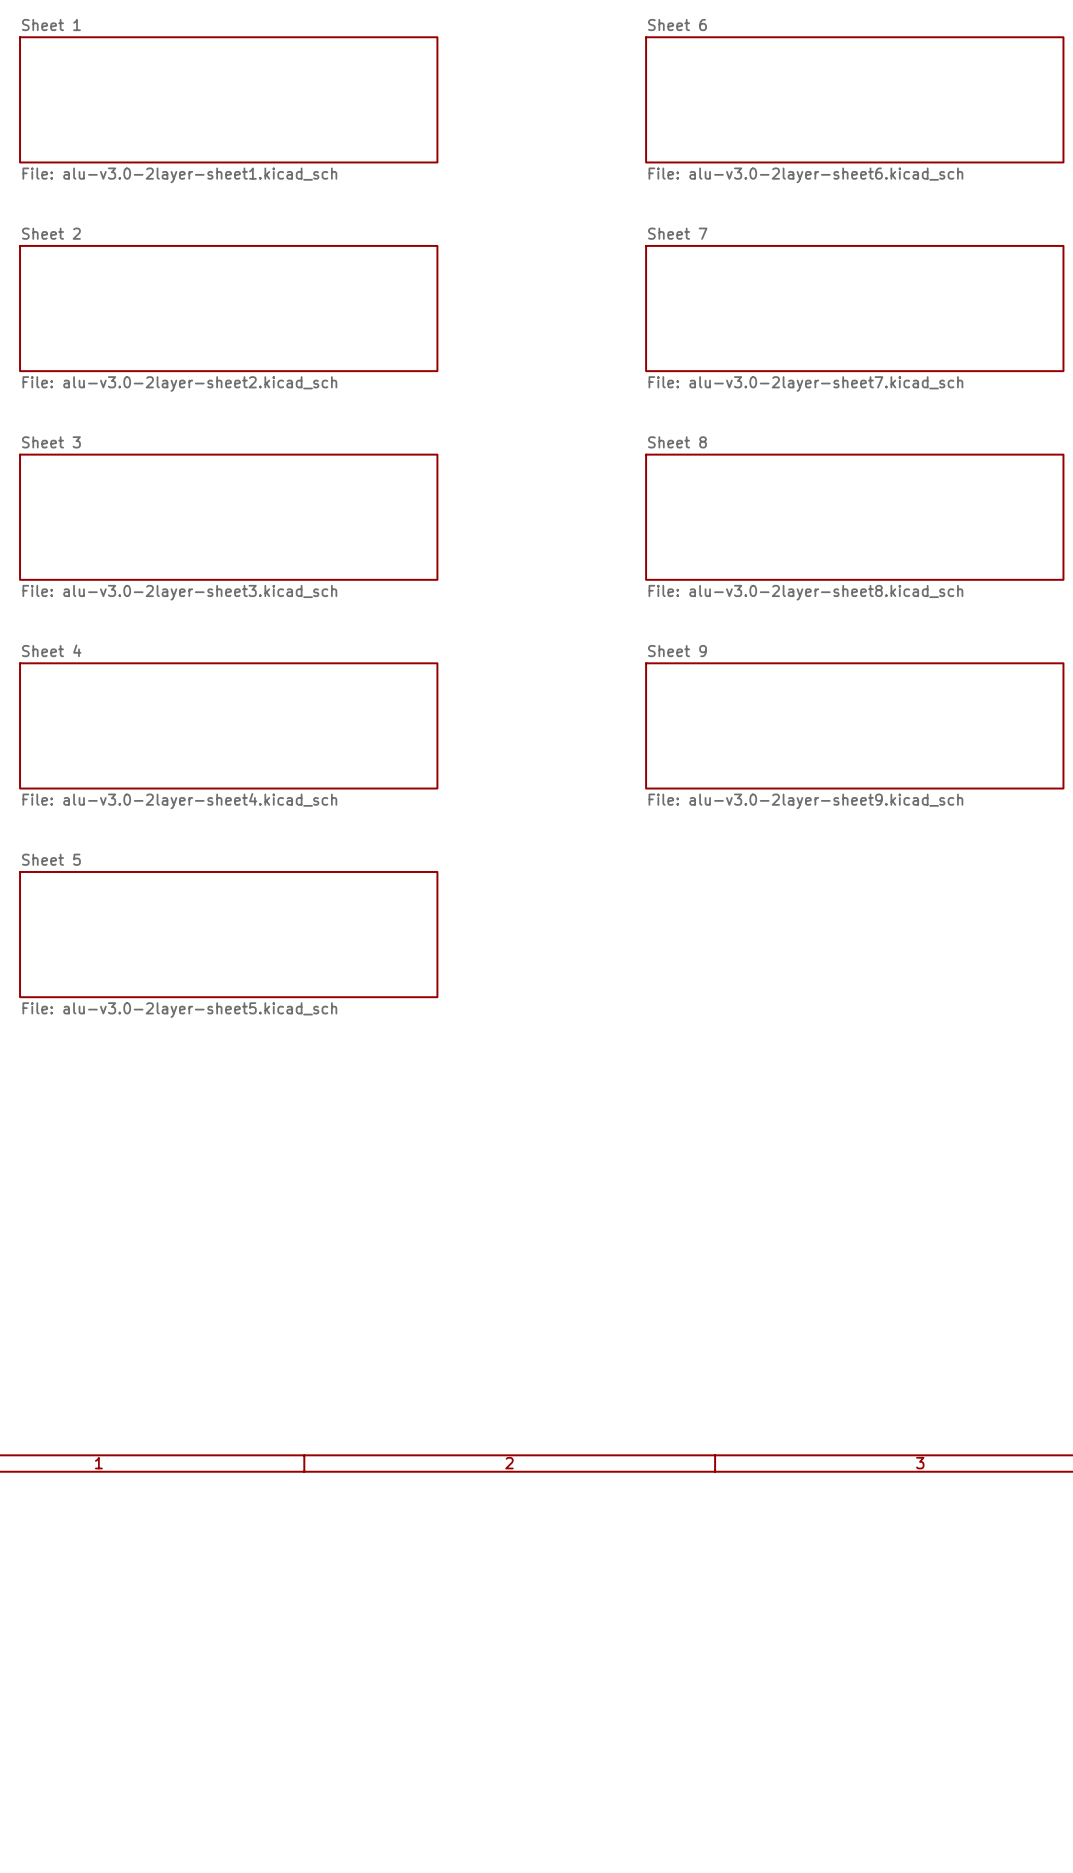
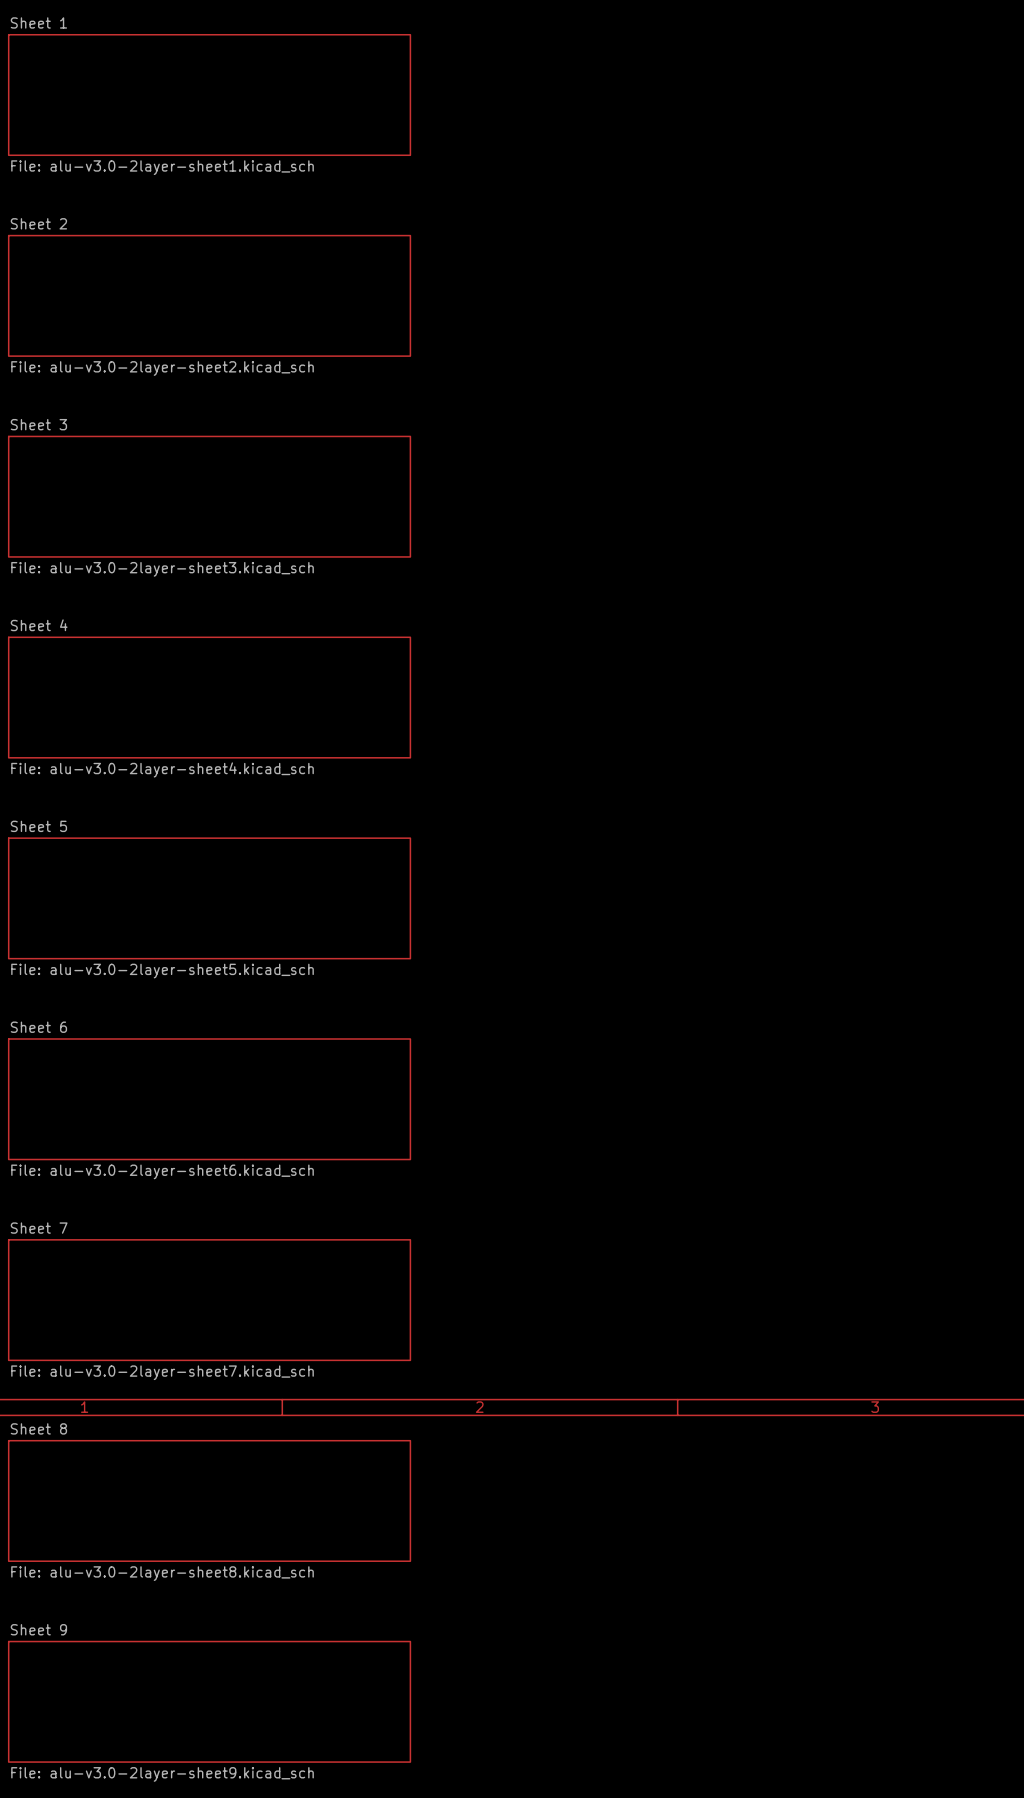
sheet Sheet 6 position: (854, 99) -> (209, 1099)
sheet Sheet 7 position: (854, 308) -> (209, 1300)
sheet Sheet 8 position: (854, 517) -> (209, 1500)
sheet Sheet 9 position: (854, 725) -> (209, 1701)

